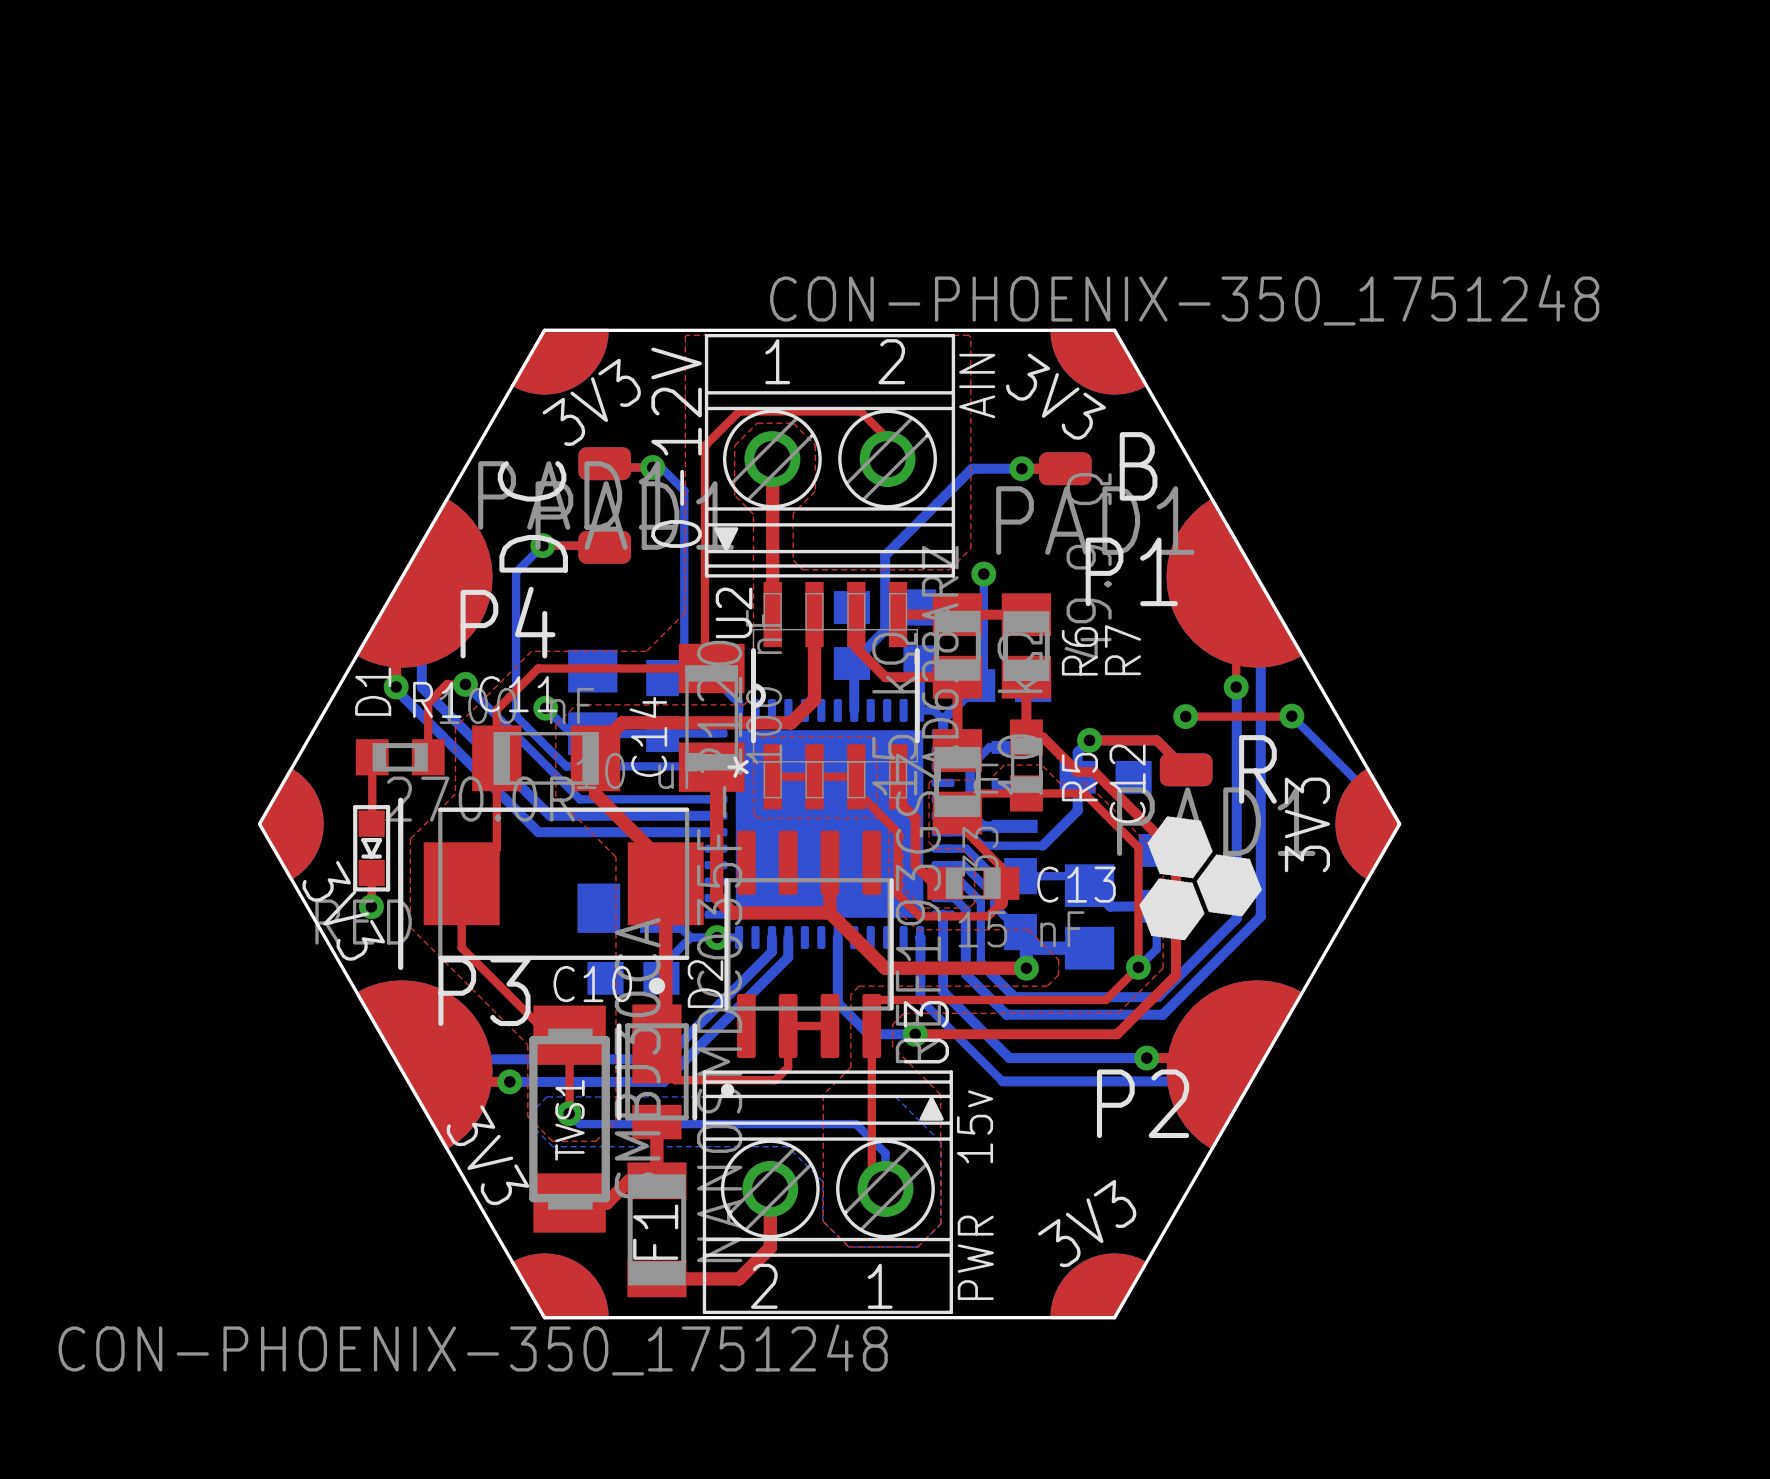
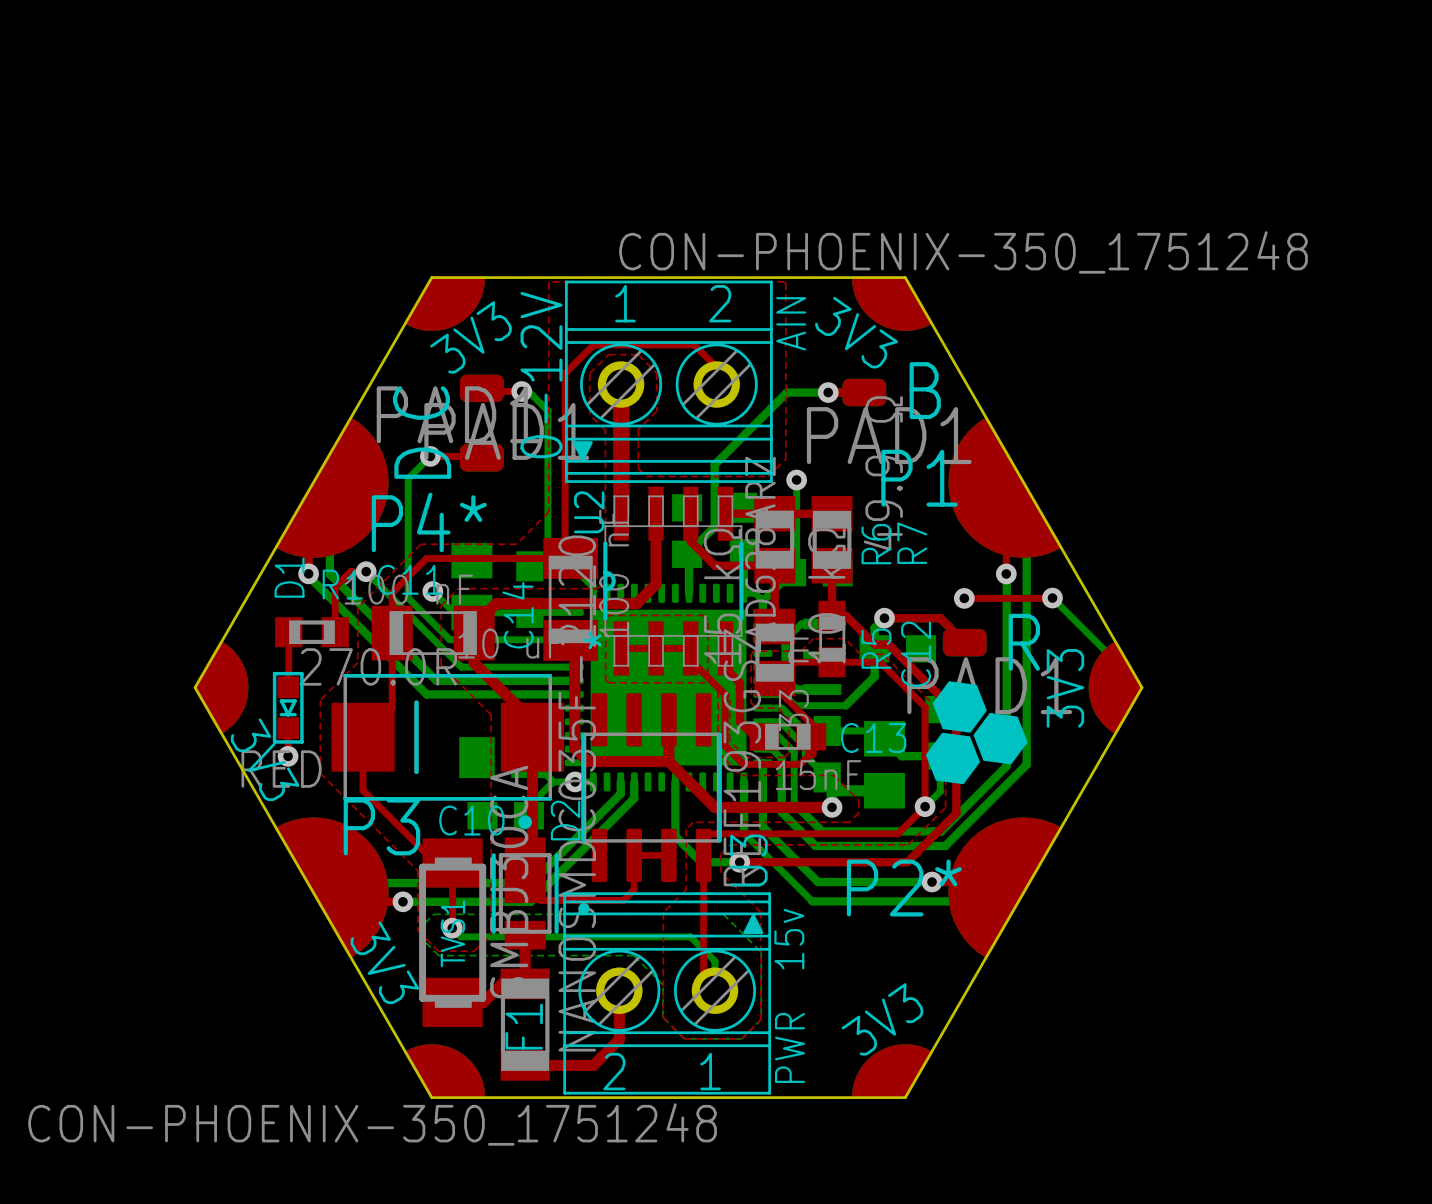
top track width: thin (772, 459) (772, 614) -> thick (621, 384) (621, 513)
text: P4 (508, 622) -> P4* (429, 522)
C10 footprint: [398, 797, 704, 970] -> [331, 674, 565, 801]
C13 value: 15 nF (1021, 929) -> 15nF (818, 775)
text: P2 (1143, 1103) -> P2* (904, 888)

